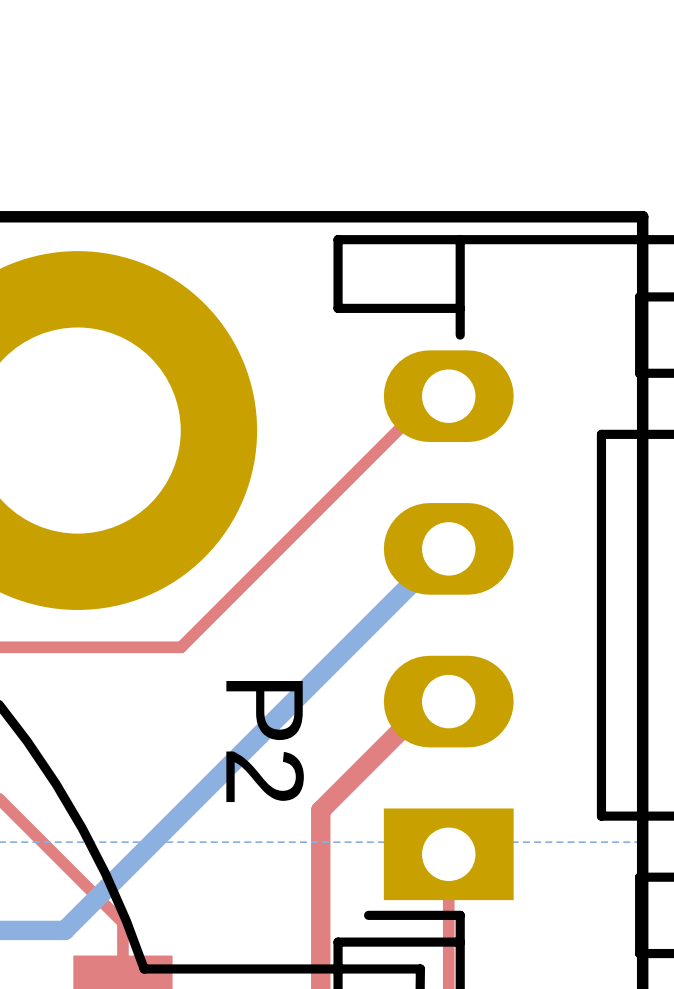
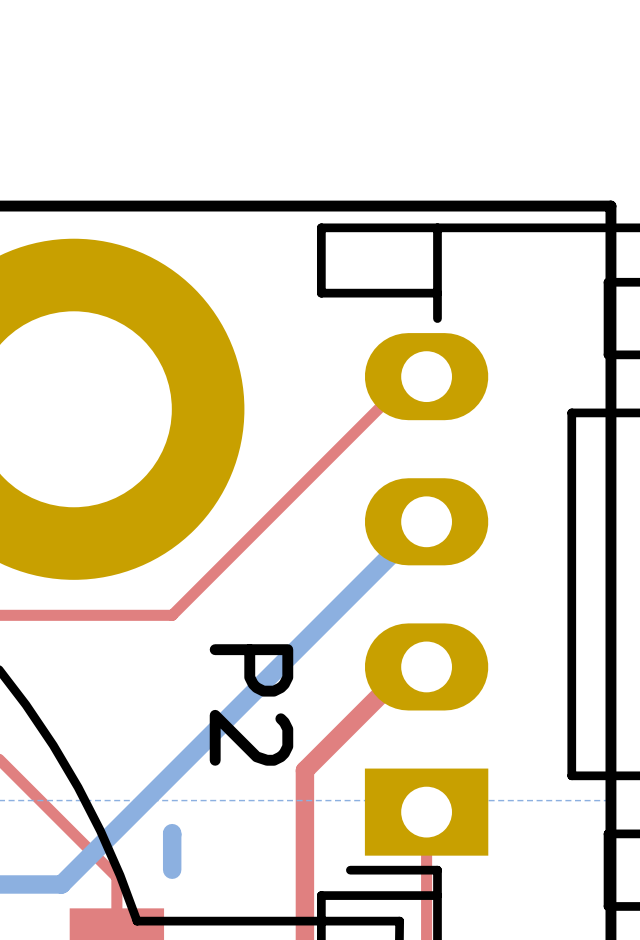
bottom track: none -> (172, 833) (172, 869)

